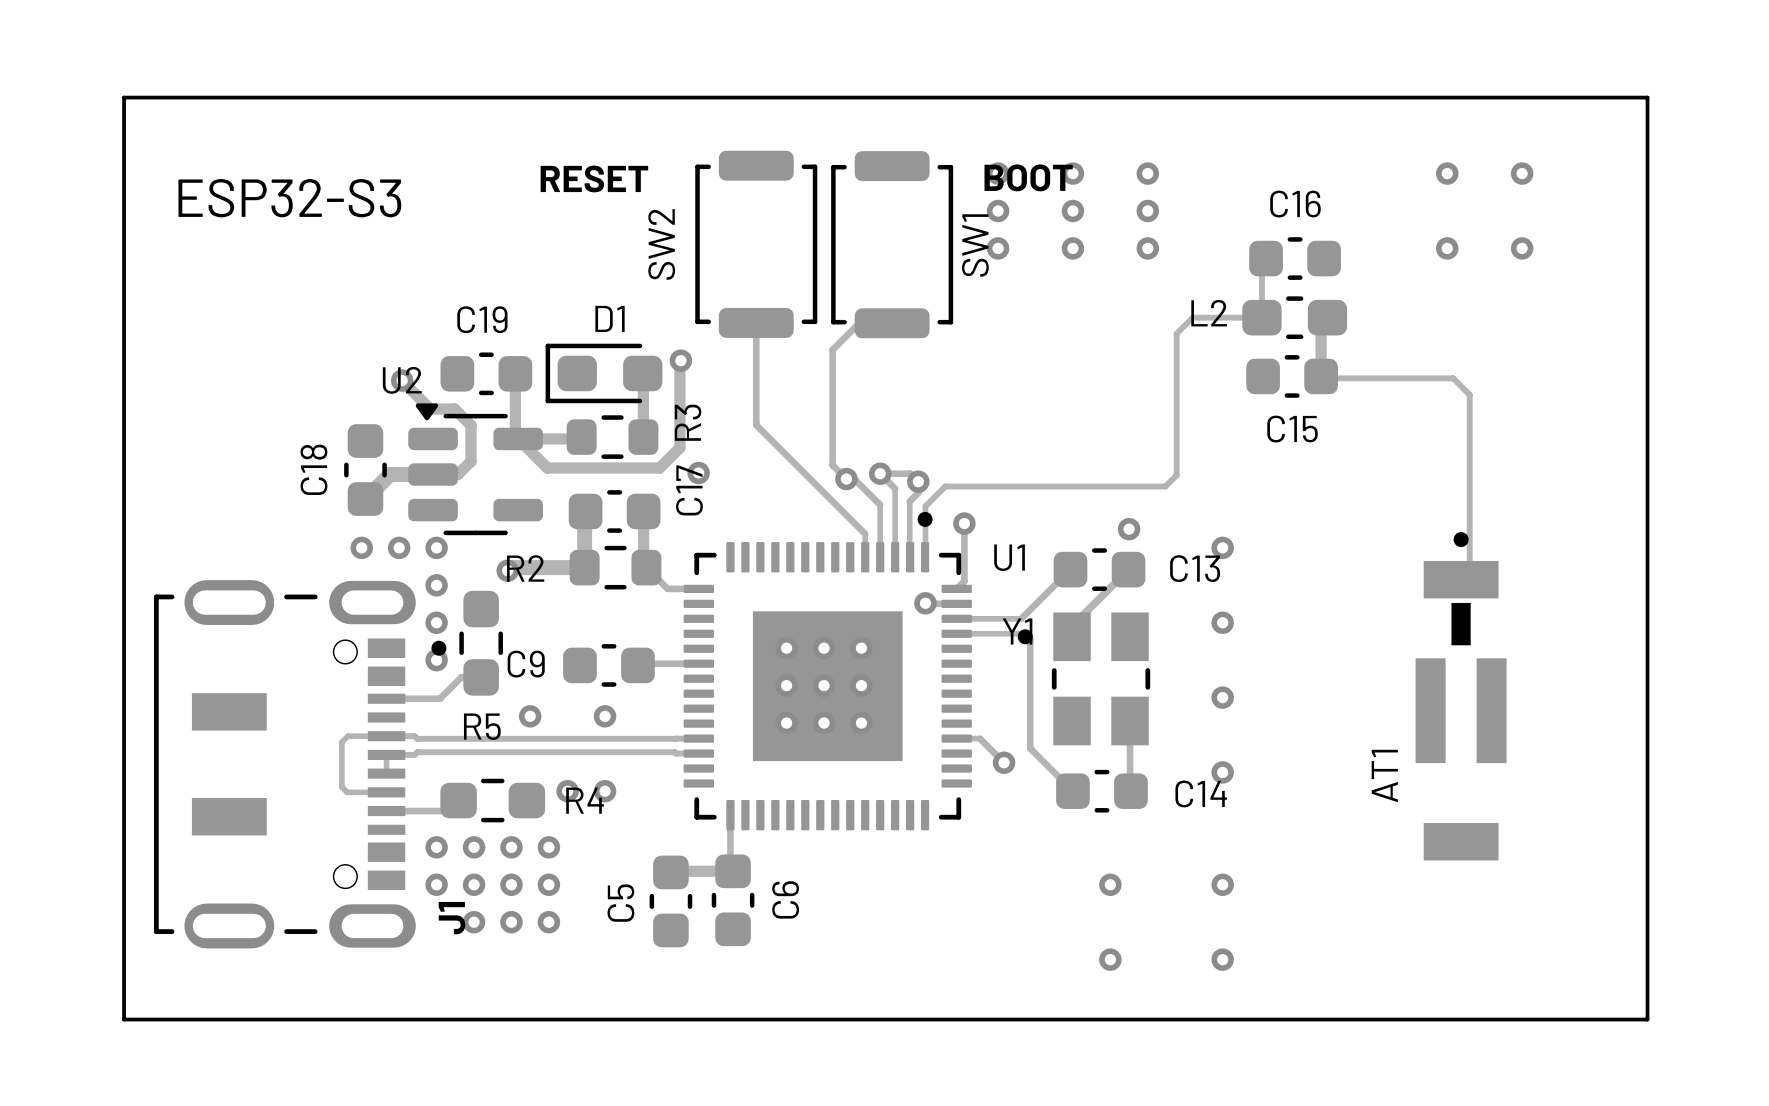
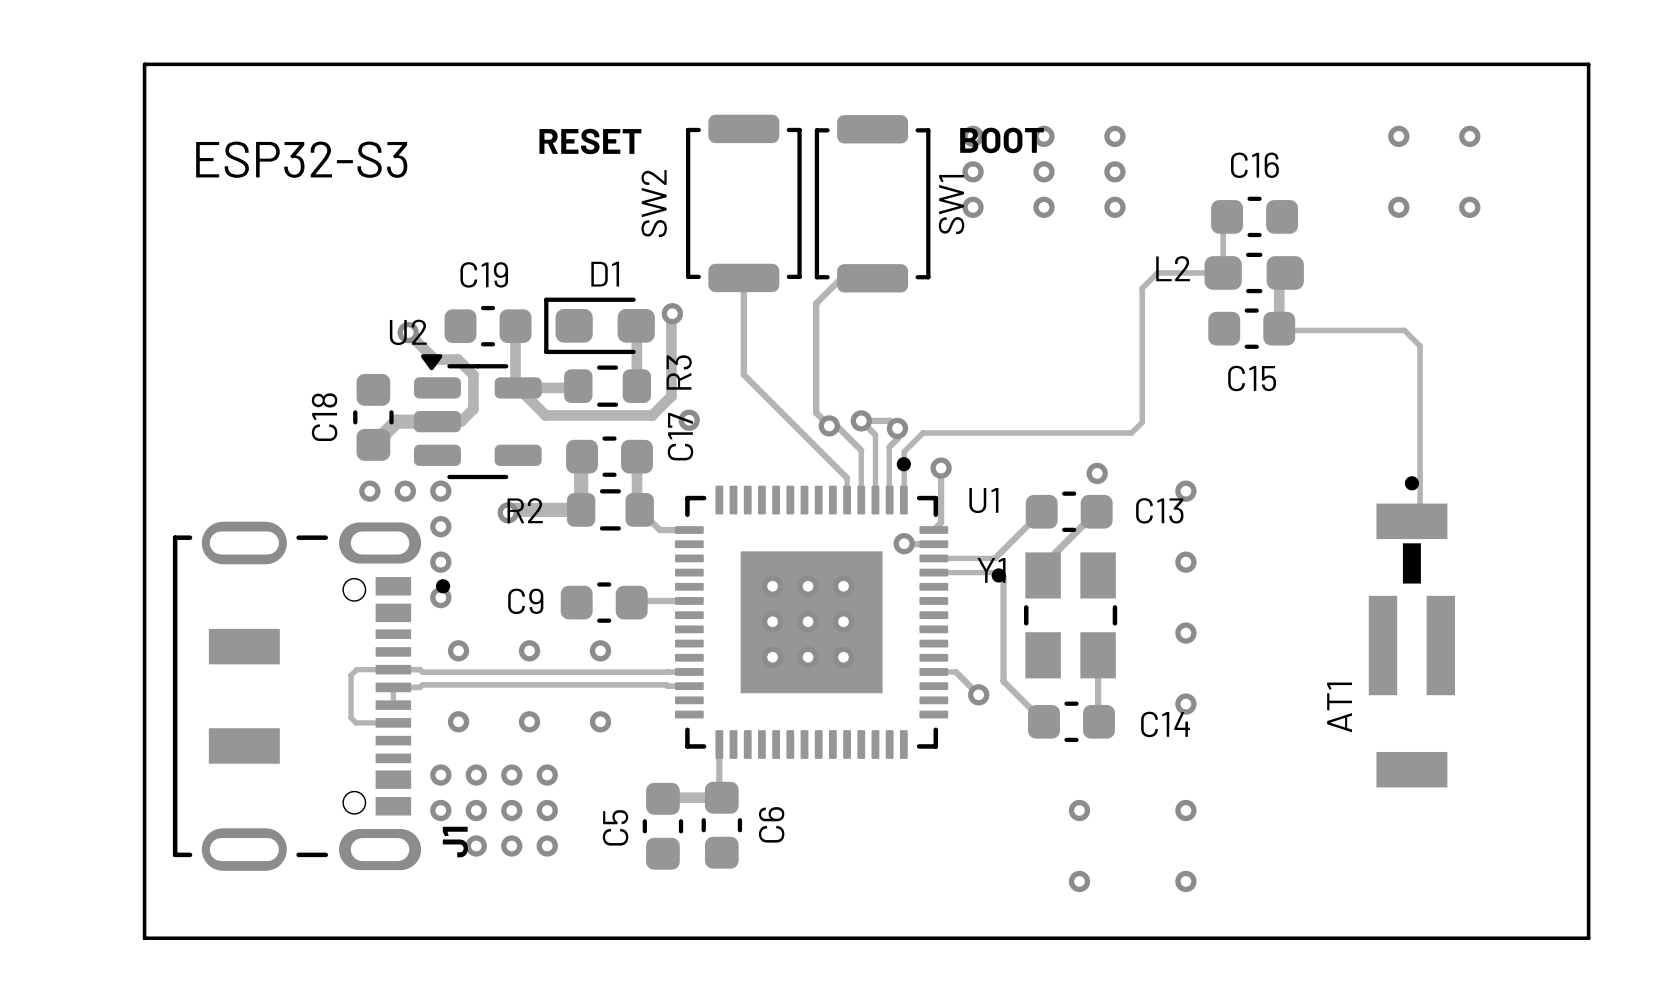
R5: (481, 643) -> none
track: (481, 677) (461, 677) (439, 698) (386, 698) -> none
via: none -> (458, 650)
via: none -> (458, 721)
via position: (567, 791) -> (529, 721)
R4: (492, 800) -> none
track: (445, 809) (386, 811) -> none

